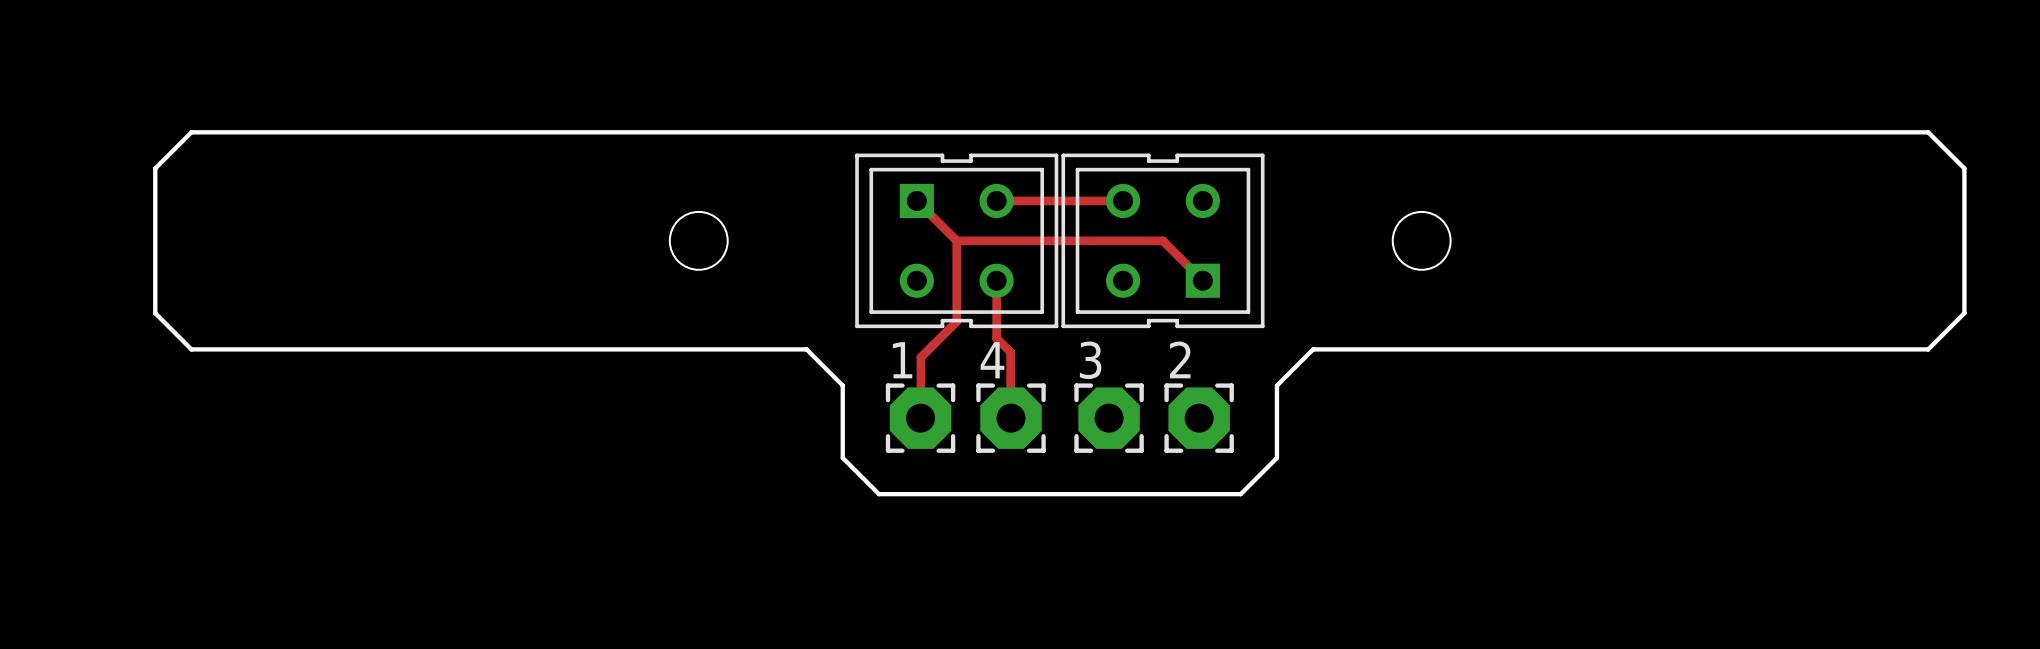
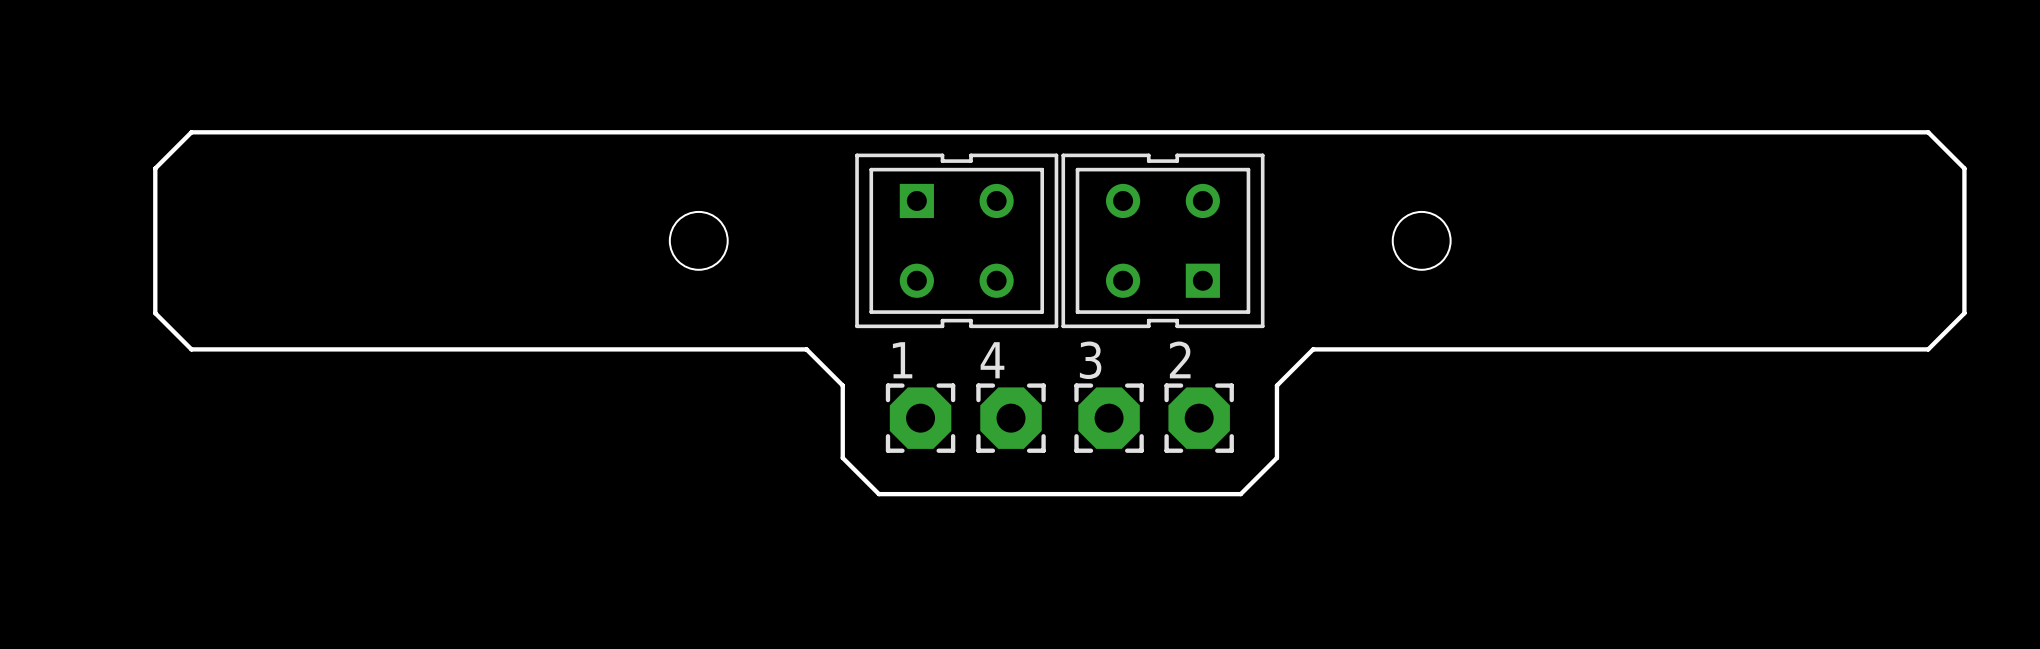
track: (916, 200) (956, 240) -> none
track: (996, 200) (1123, 200) -> none
track: (956, 240) (1162, 240) (1202, 280) -> none
track: (956, 240) (956, 321) (920, 357) (920, 417) -> none
track: (996, 280) (996, 338) (1010, 352) (1010, 417) -> none

